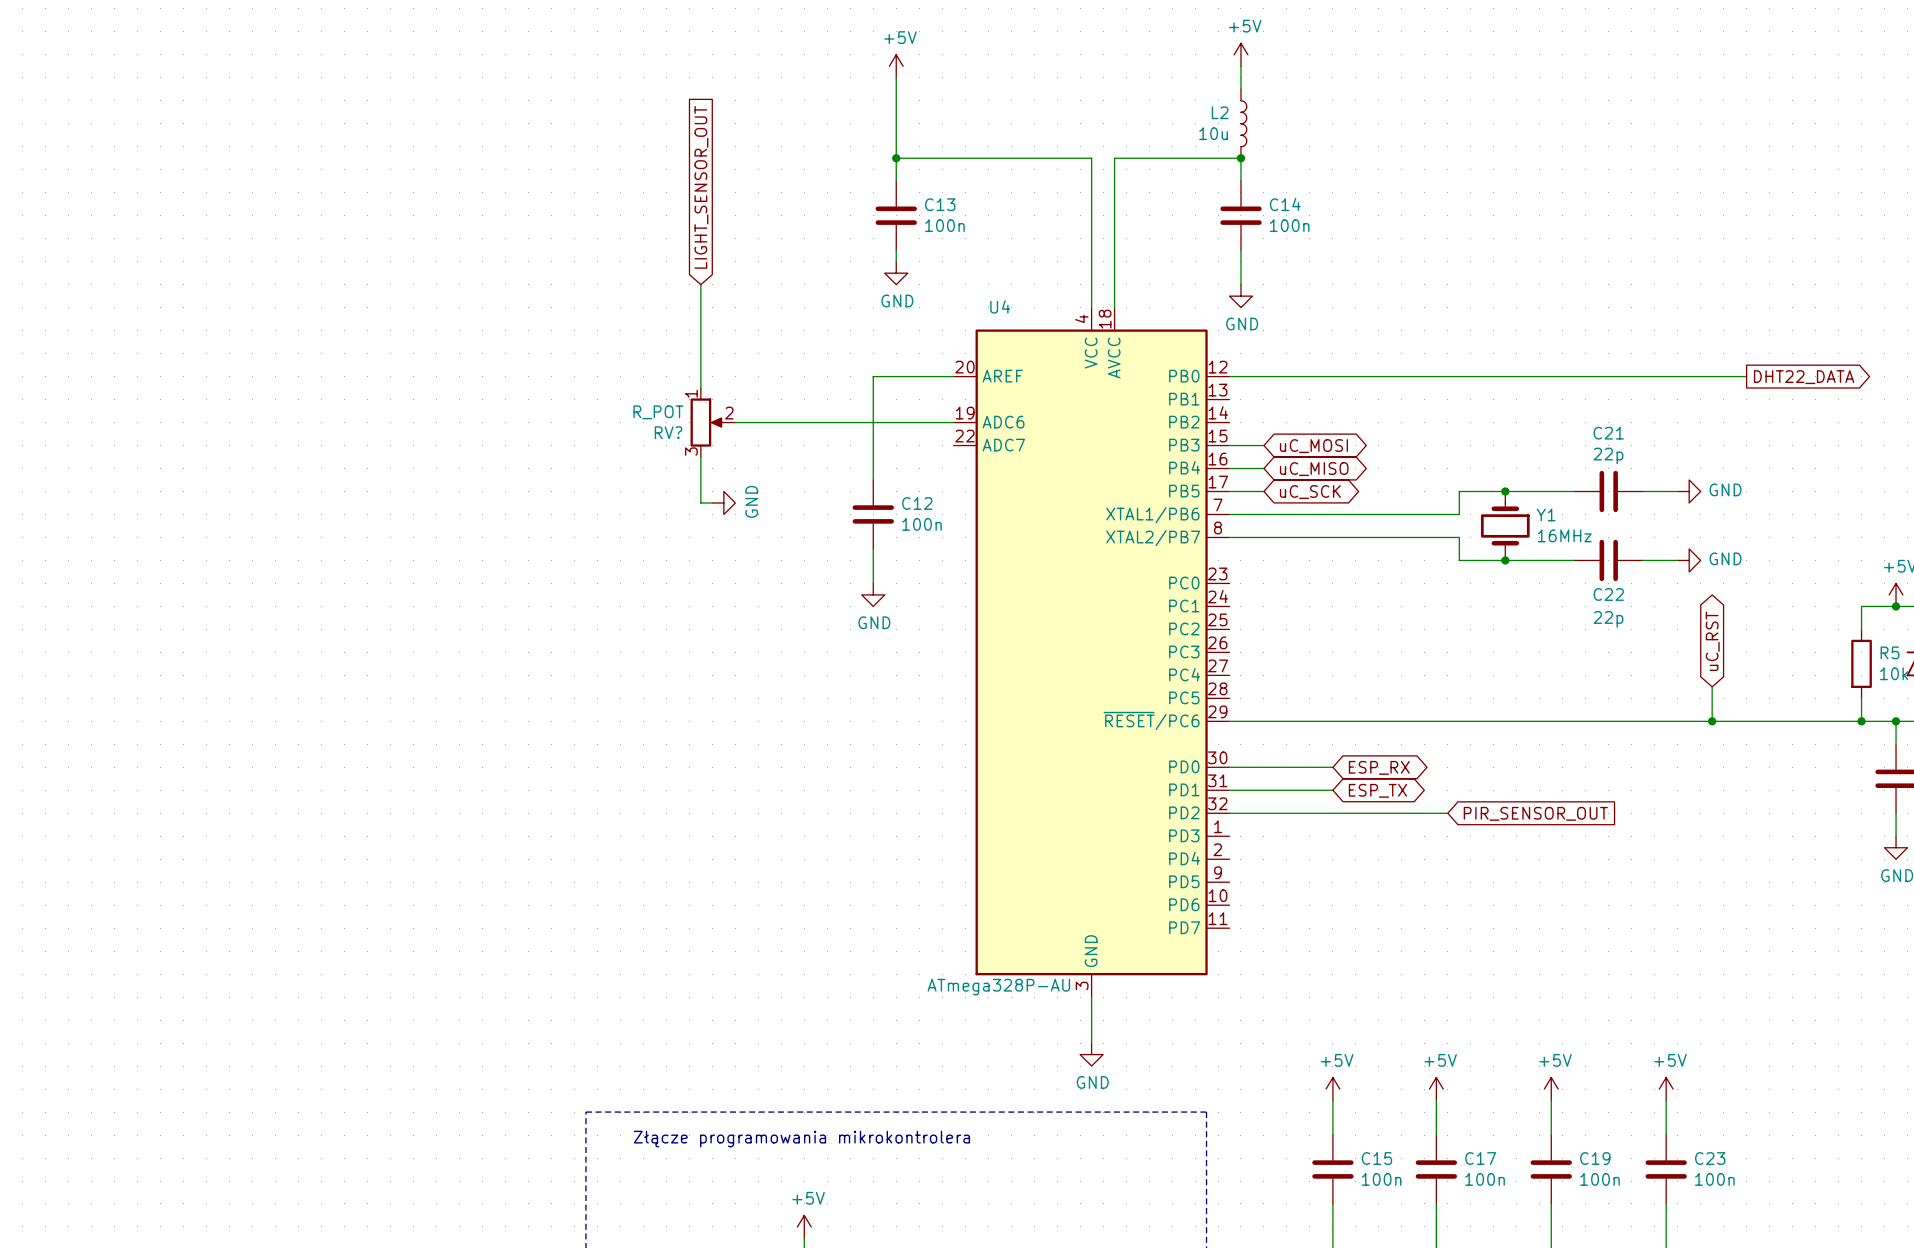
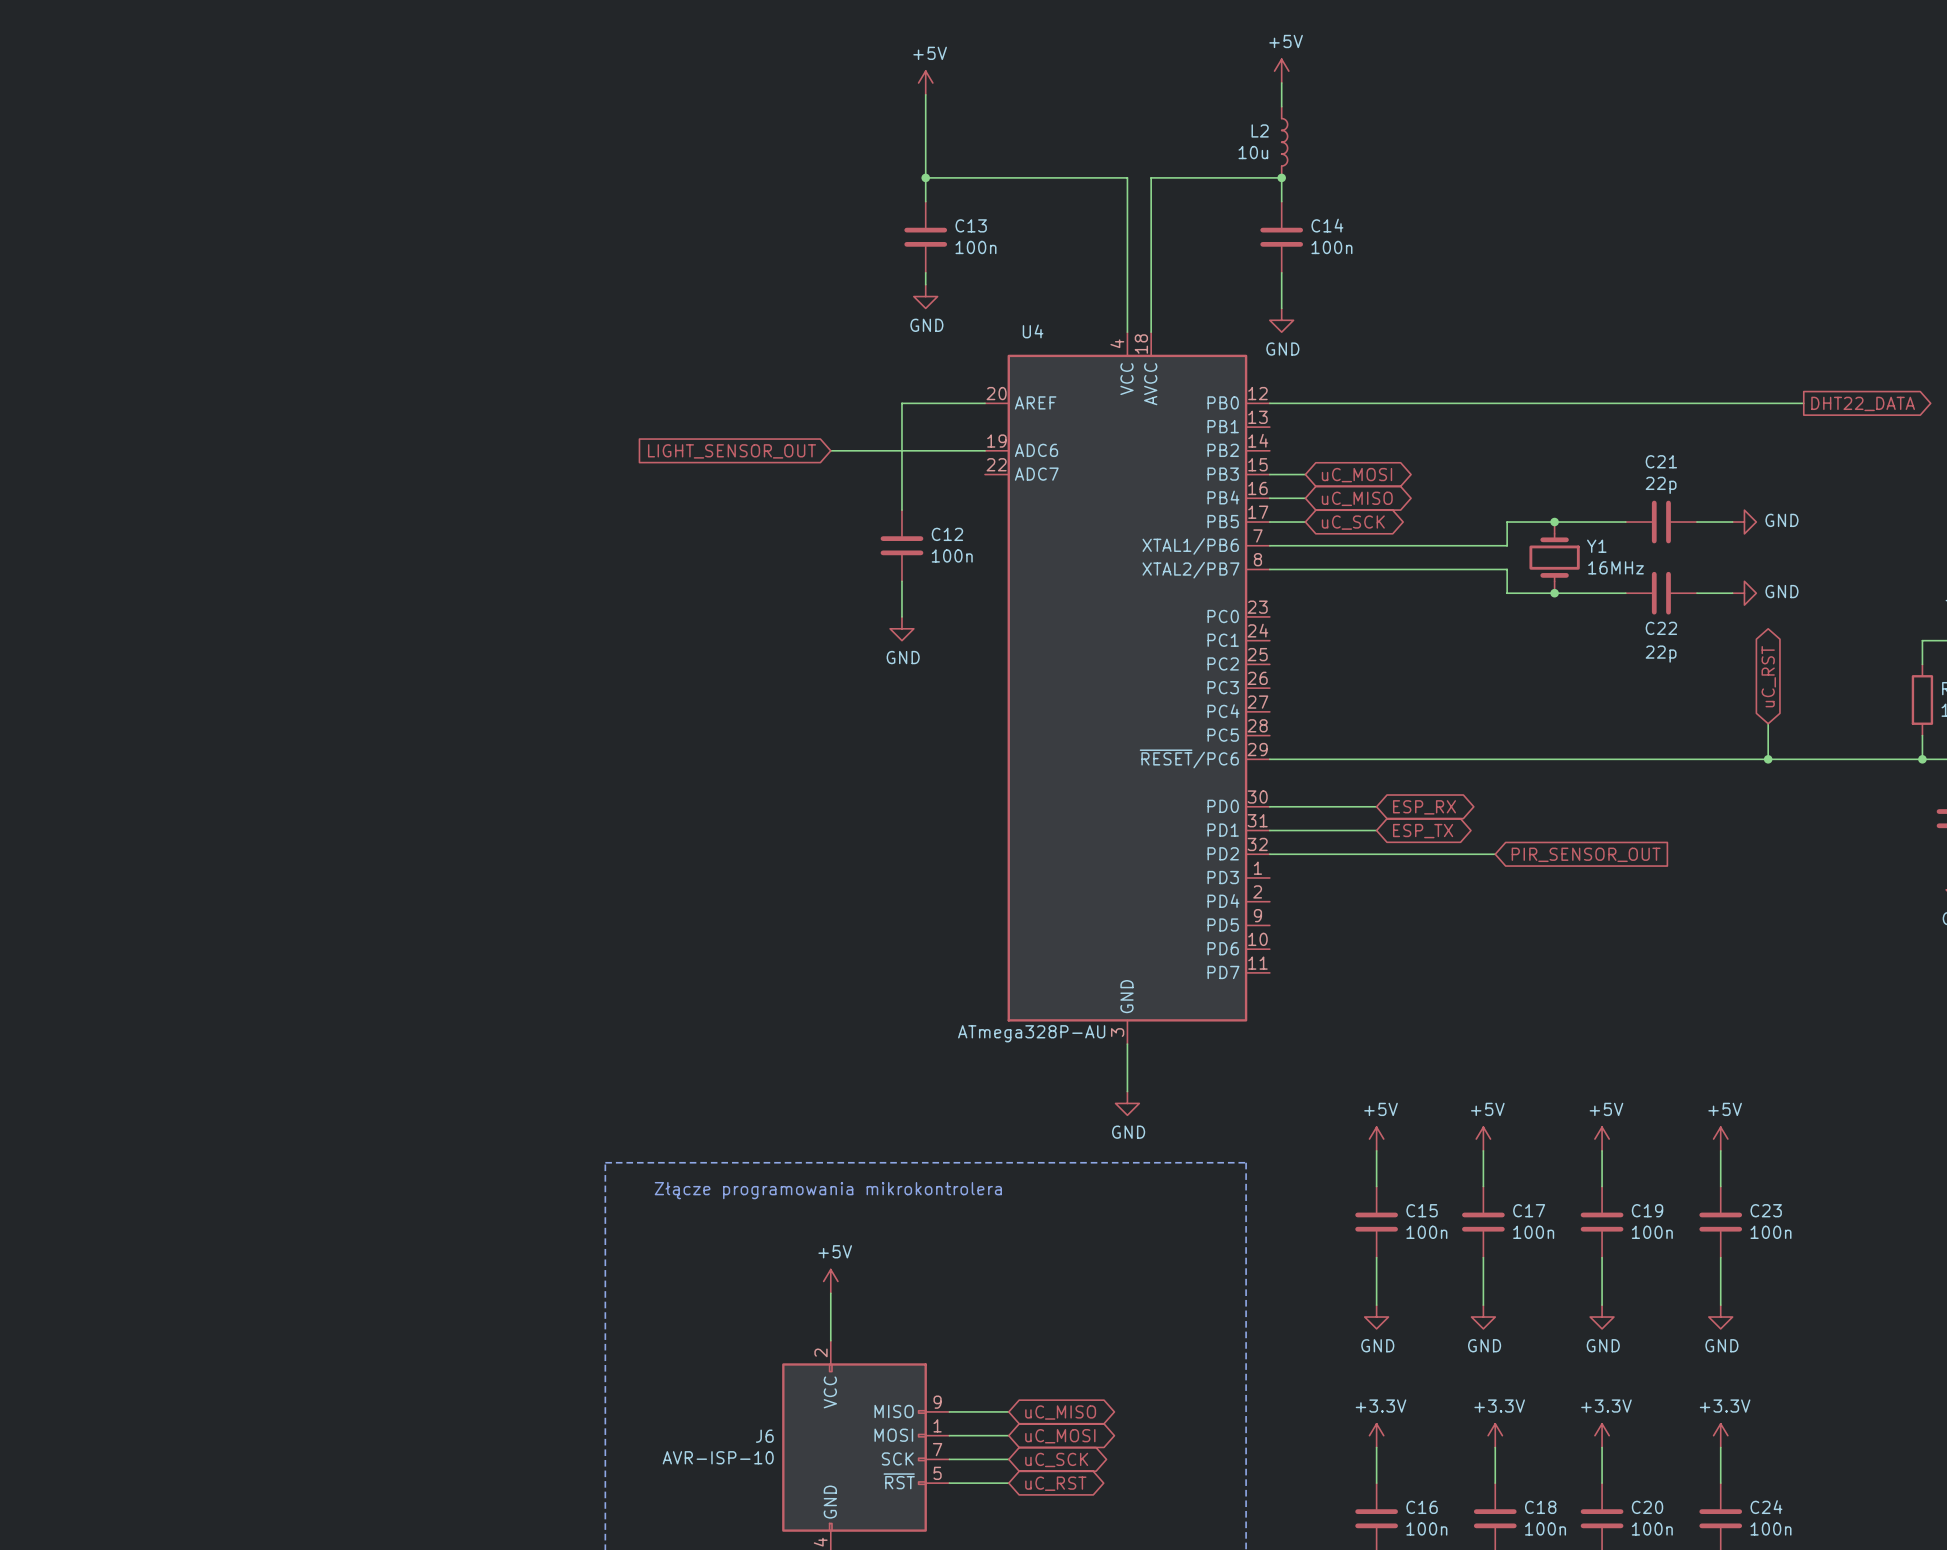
global label rotation: 0° (701, 187) -> 90° counterclockwise (732, 451)
global label position: LIGHT_SENSOR_OUT (701, 187) -> LIGHT_SENSOR_OUT (732, 451)
wire: (700, 284) (700, 388) -> none
RV?: R_POT (712, 422) -> none
wire: (735, 422) (804, 422) -> none
wire: (700, 457) (700, 502) (712, 502) -> none
power symbol: GND (723, 502) -> none

